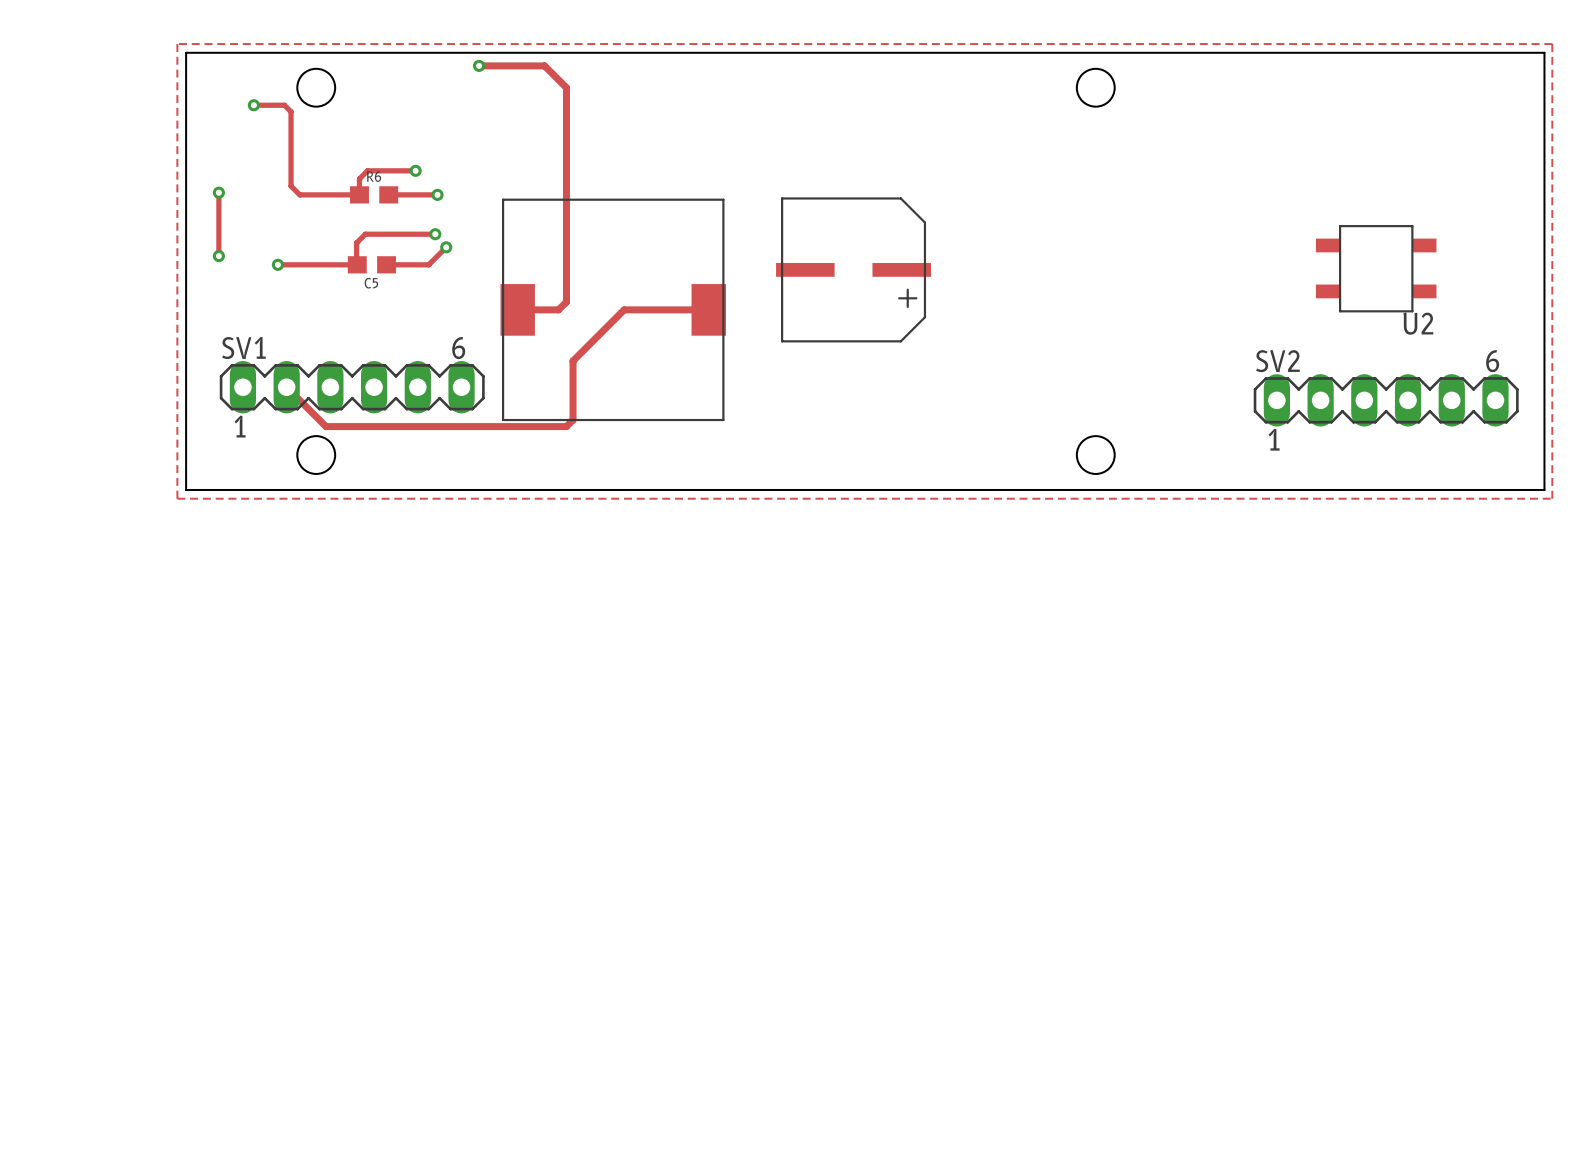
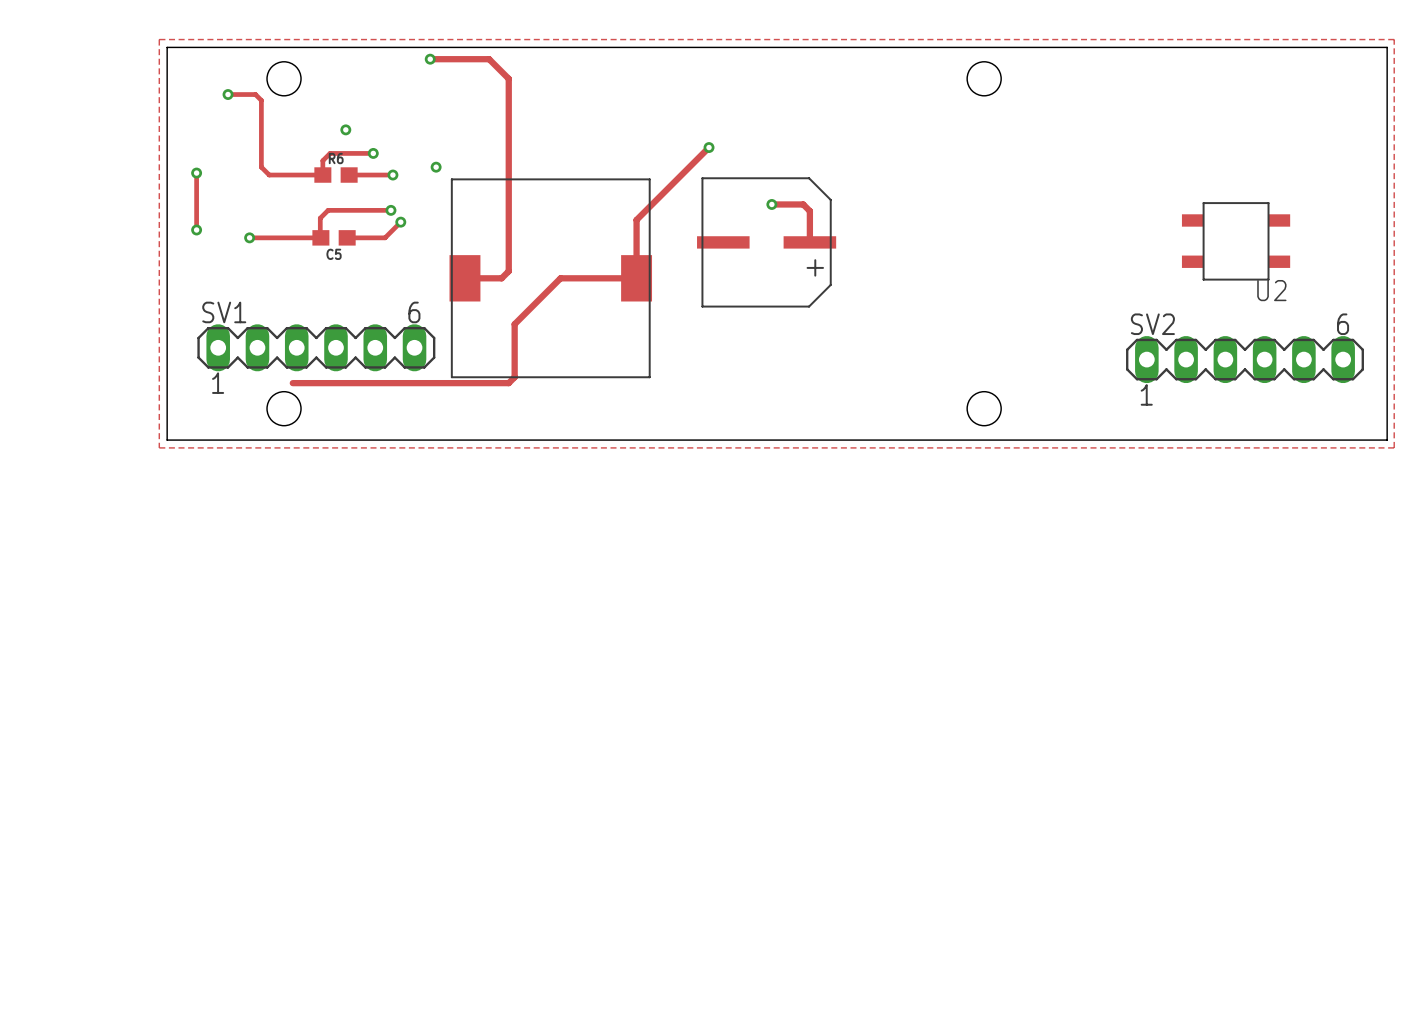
via: none -> (345, 129)
track: none -> (709, 147) (636, 219) (636, 278)
via: none -> (709, 147)
via: none -> (436, 167)
track: none -> (771, 204) (803, 204) (809, 211) (809, 242)
via: none -> (771, 204)
track: (286, 387) (326, 426) -> none

